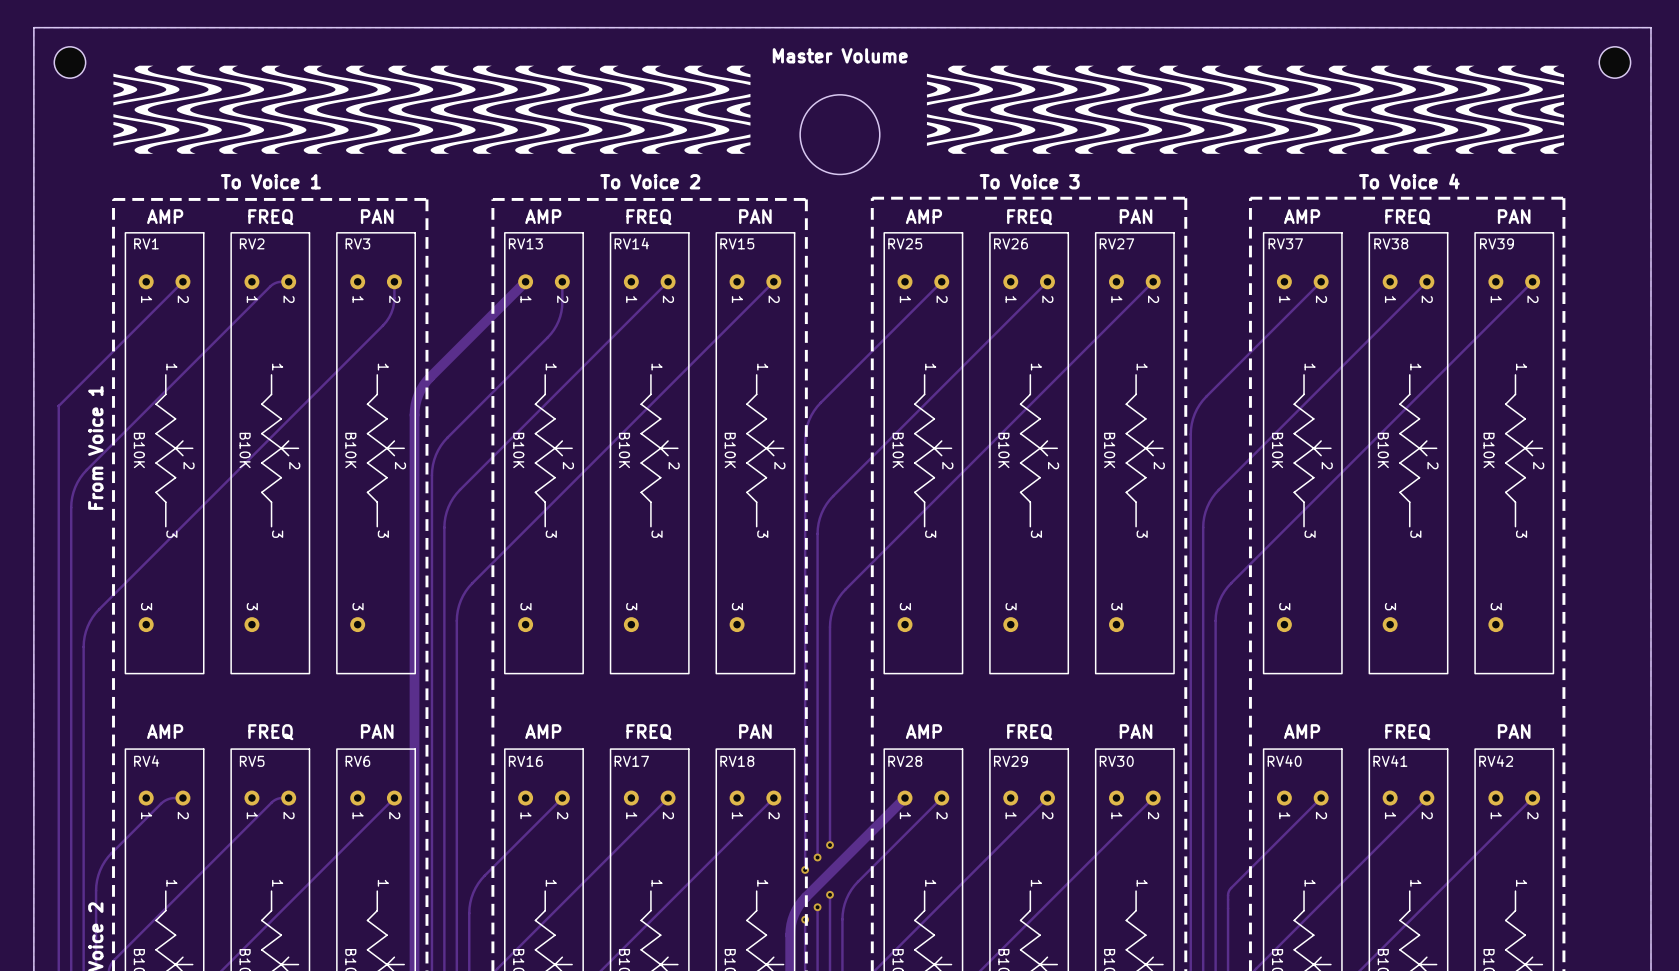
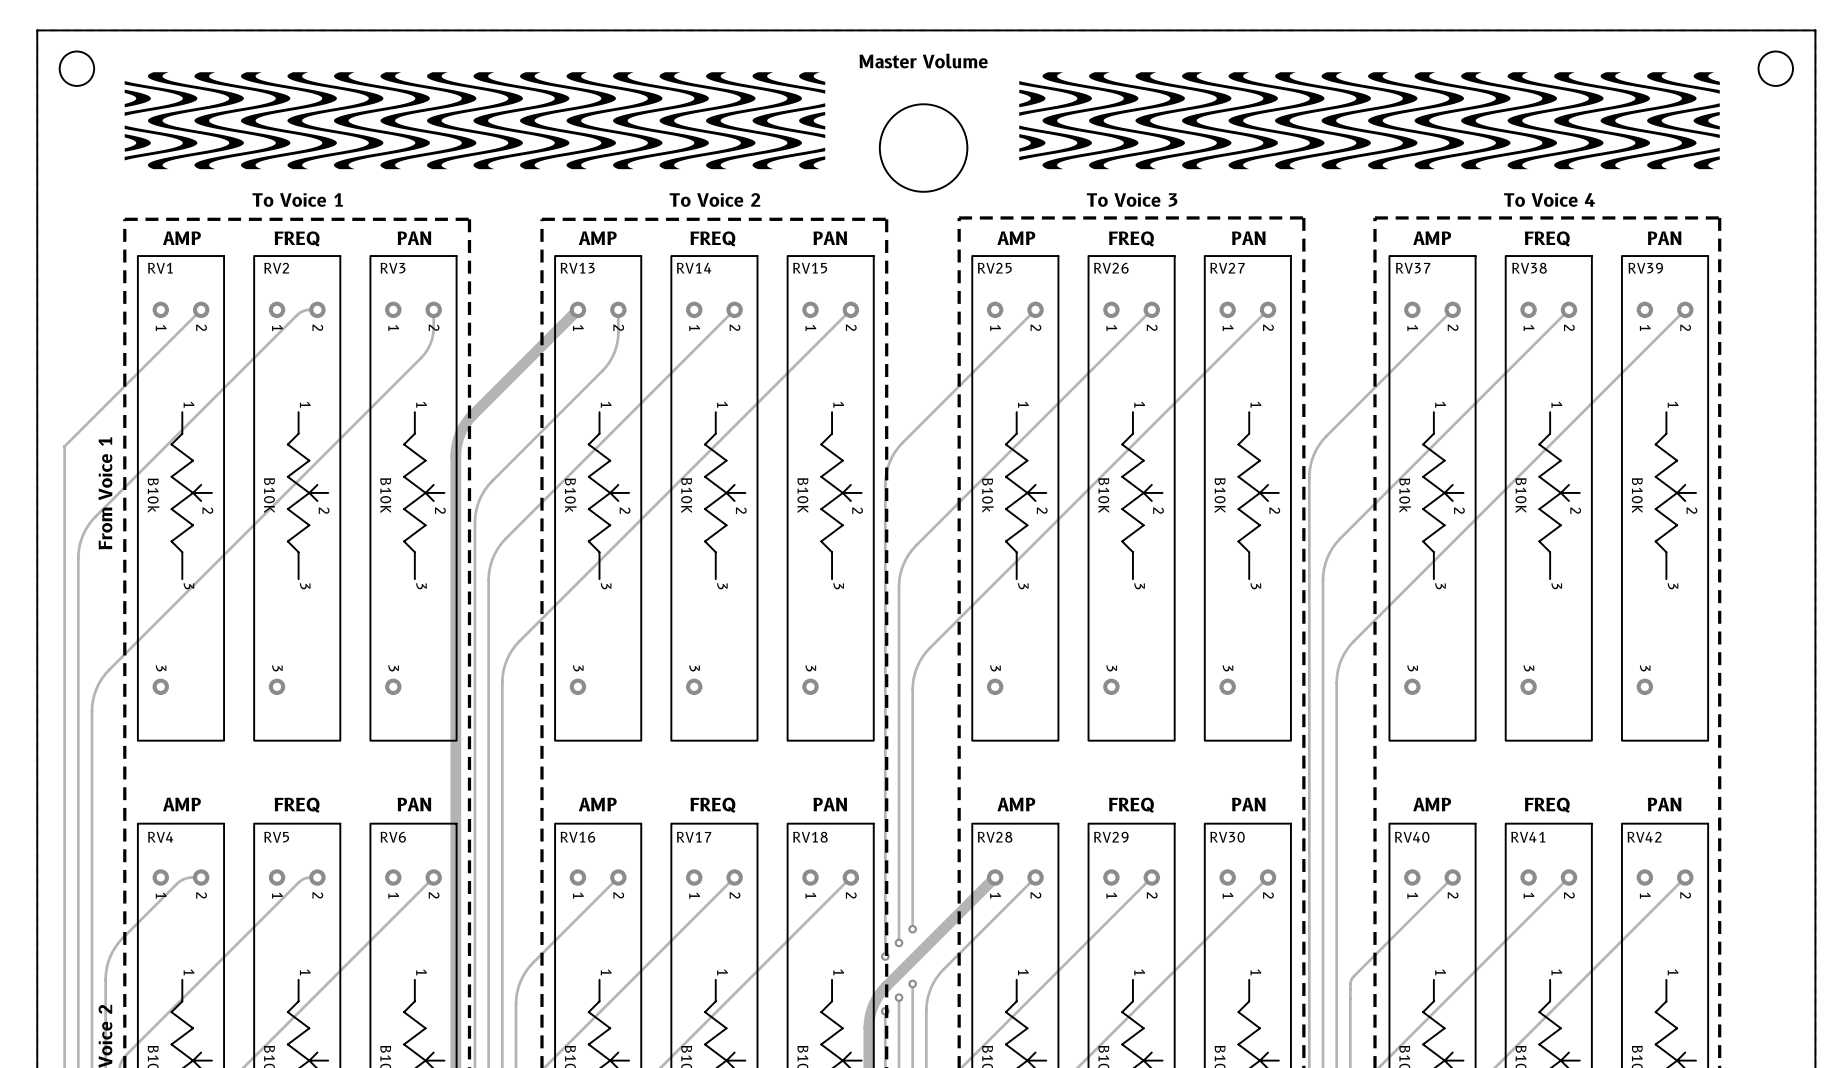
RV1 value: B10K (139, 450) -> B10k (153, 495)
RV13 value: B10K (518, 450) -> B10k (570, 495)
RV25 value: B10K (898, 450) -> B10k (987, 495)
RV37 value: B10K (1277, 450) -> B10k (1405, 495)

